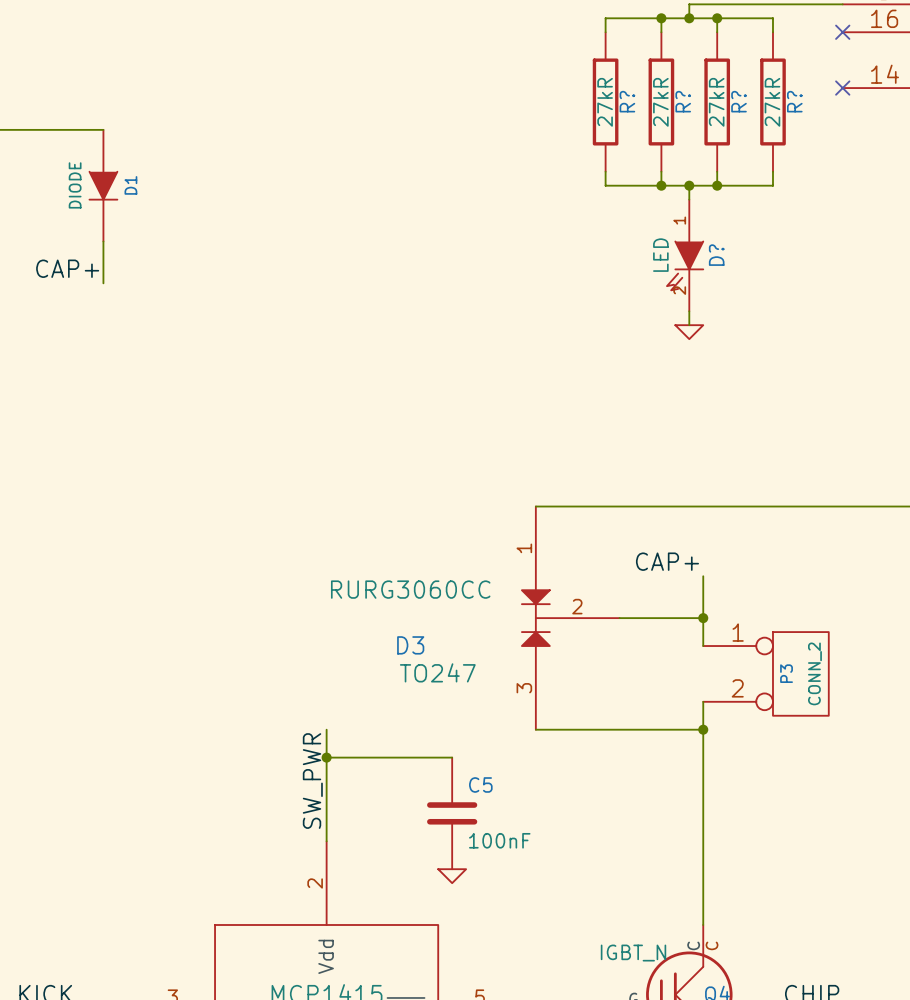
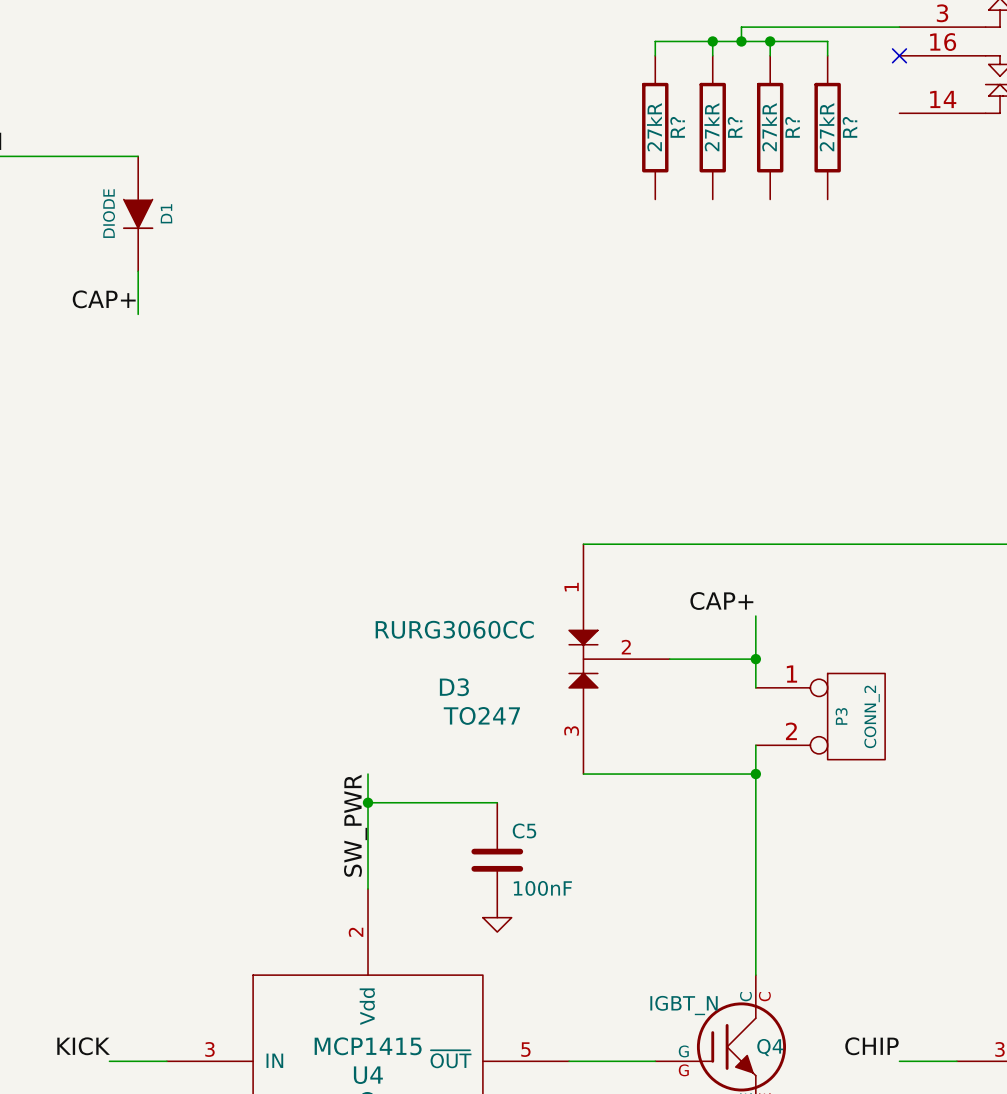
no-connect mark: (842, 88) -> none
wire: (605, 171) (605, 185) (772, 185) (772, 171) -> none
wire: (661, 171) (661, 185) -> none
wire: (717, 171) (717, 185) -> none
junction: (661, 185) -> none
wire: (689, 185) (689, 199) -> none
junction: (689, 185) -> none
junction: (717, 185) -> none
D?: LED (685, 255) -> none
wire: (689, 311) (689, 325) -> none
power symbol: (689, 332) -> none

